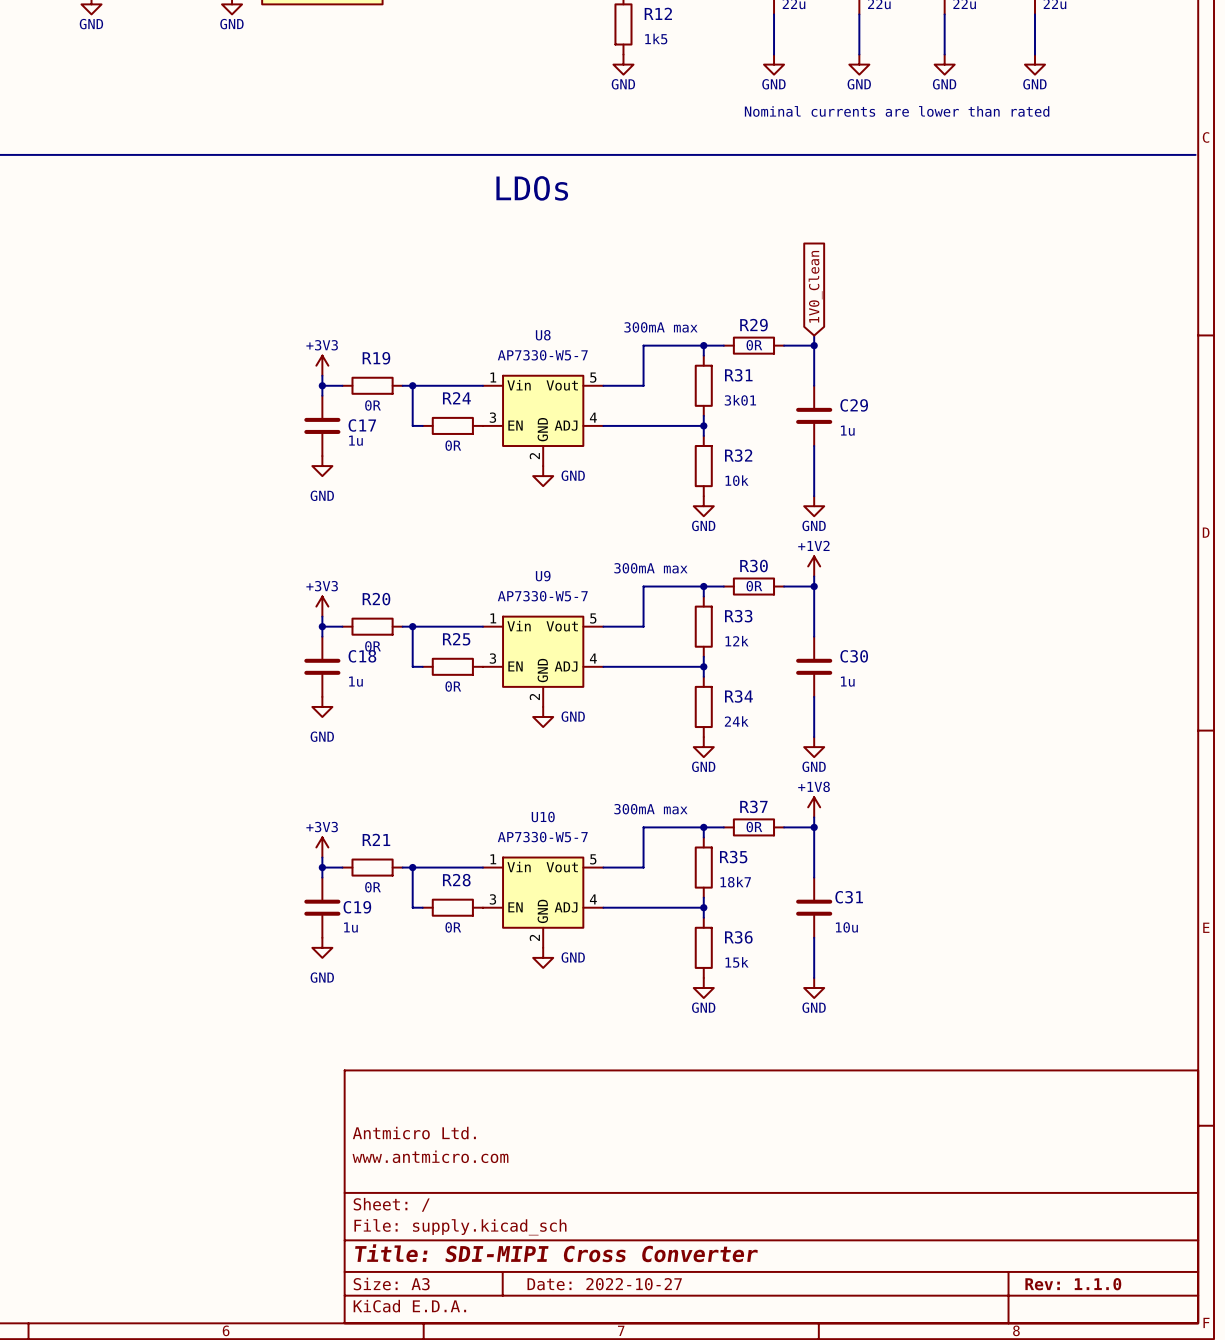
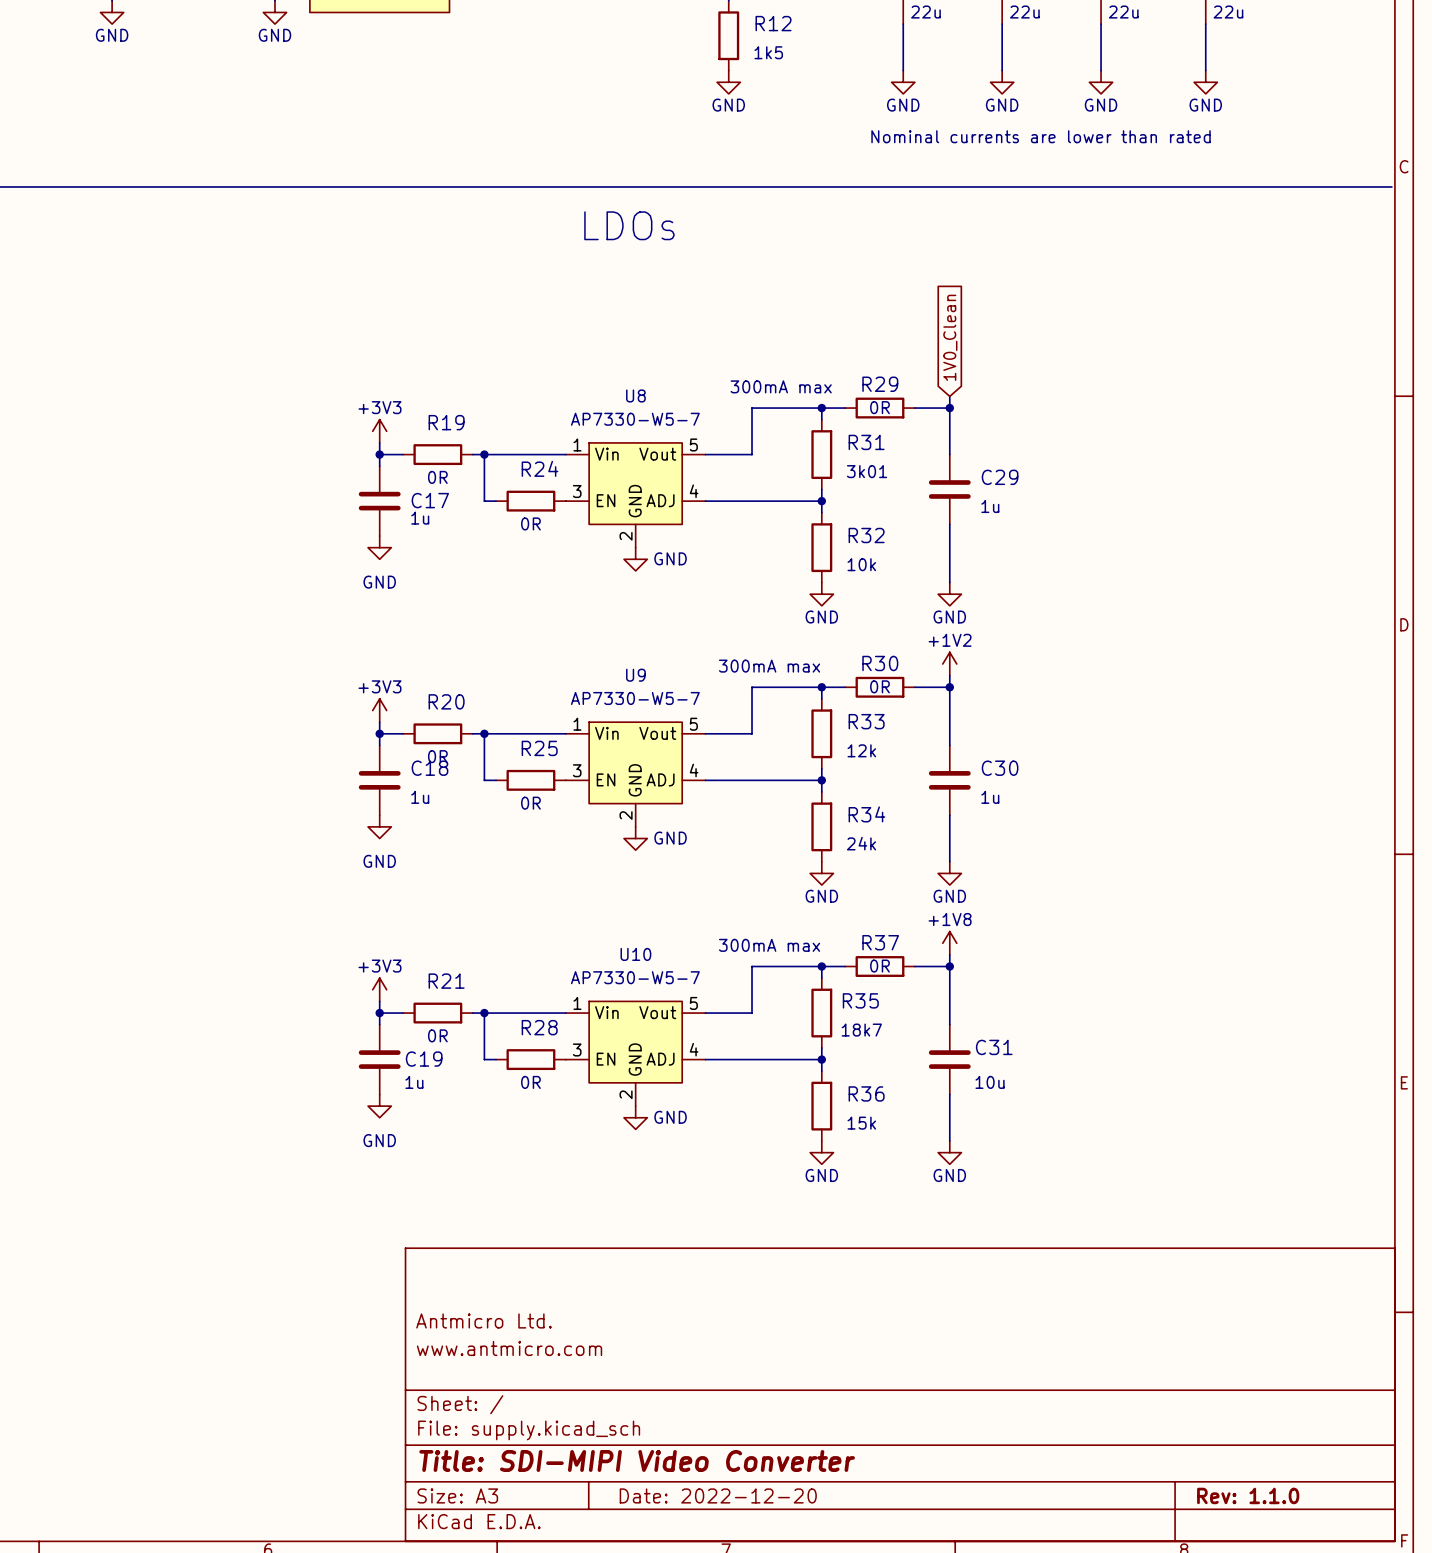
title block: Title: SDI-MIPI Cross Converter (556, 1253) -> Title: SDI-MIPI Video Converter (637, 1460)
title block: Date: 2022-10-27 (604, 1284) -> Date: 2022-12-20 (718, 1495)

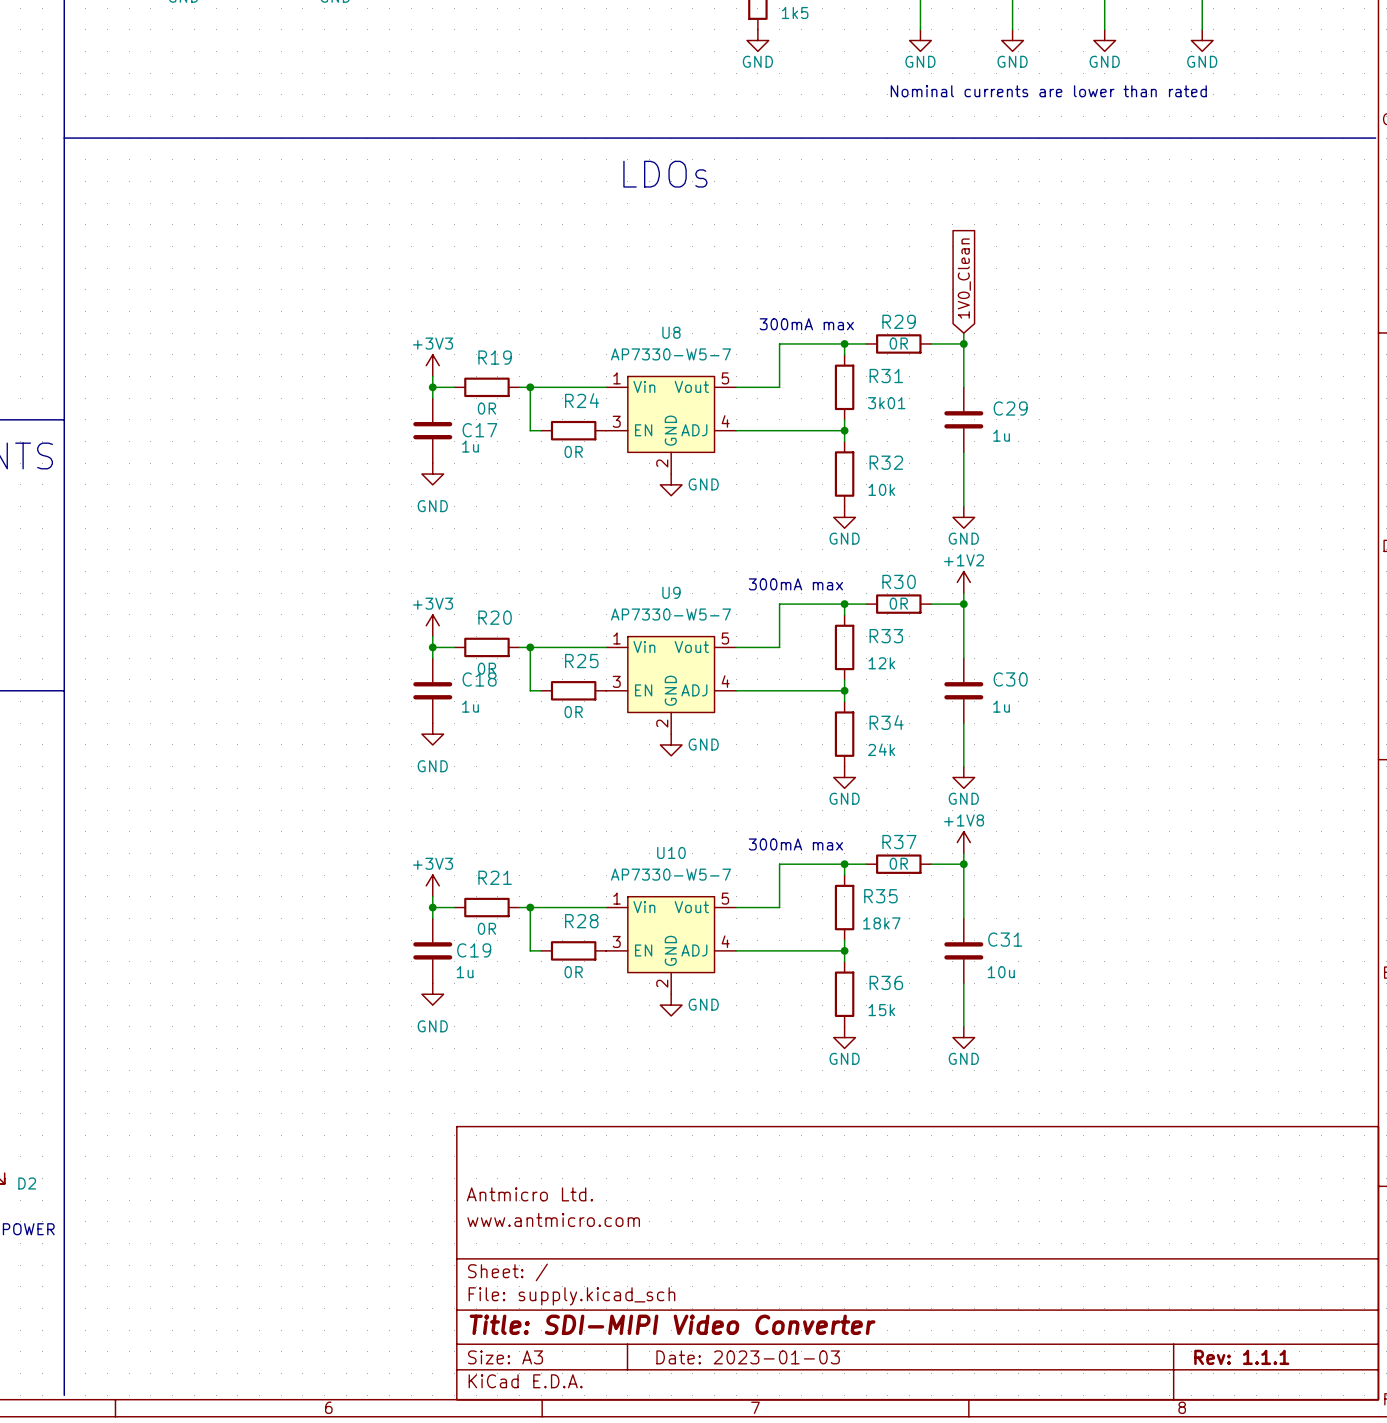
title block: Date: 2022-12-20 (718, 1495) -> Date: 2023-01-03 (748, 1357)
title block: Rev: 1.1.0 (1248, 1495) -> Rev: 1.1.1 (1241, 1357)

